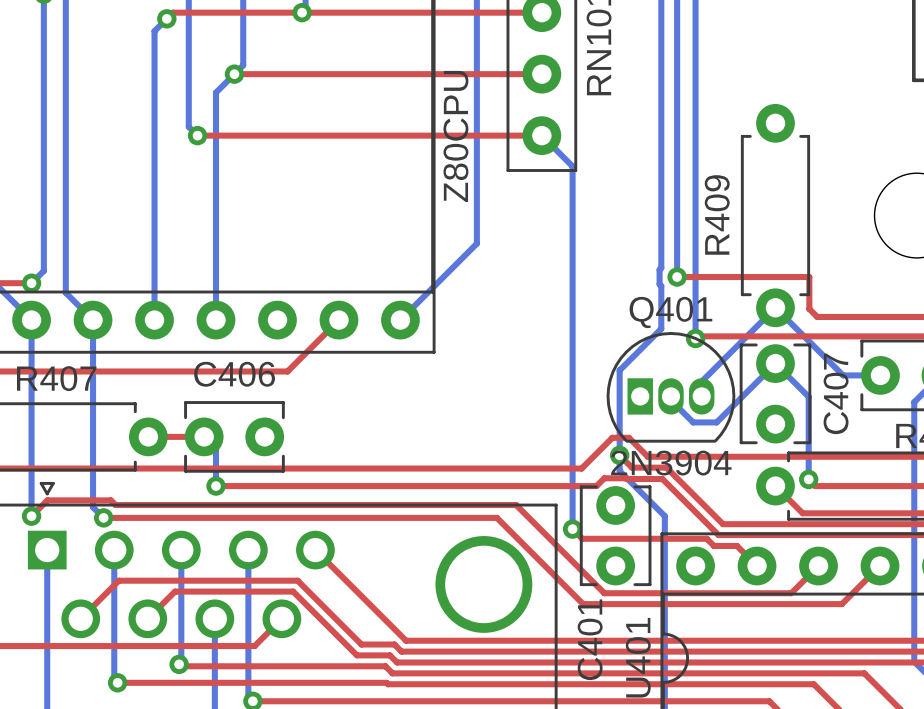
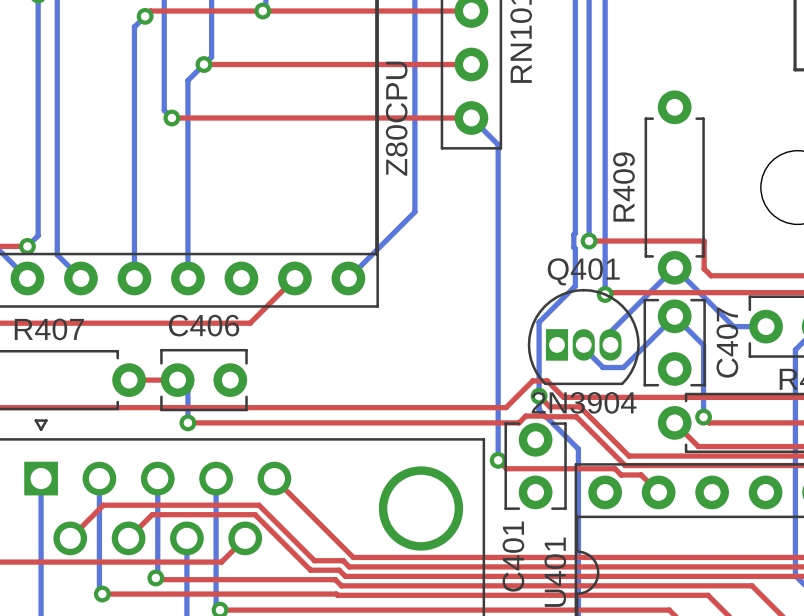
bottom track: (31, 320) (31, 516) -> none
bottom track: (93, 320) (93, 507) (103, 517) -> none
top track: (31, 516) (47, 500) (110, 500) (115, 505) (516, 505) (604, 593) (791, 593) (818, 566) -> none
via: (31, 516) -> none
top track: (103, 517) (496, 517) (583, 604) (841, 604) (880, 566) -> none
via: (103, 517) -> none

